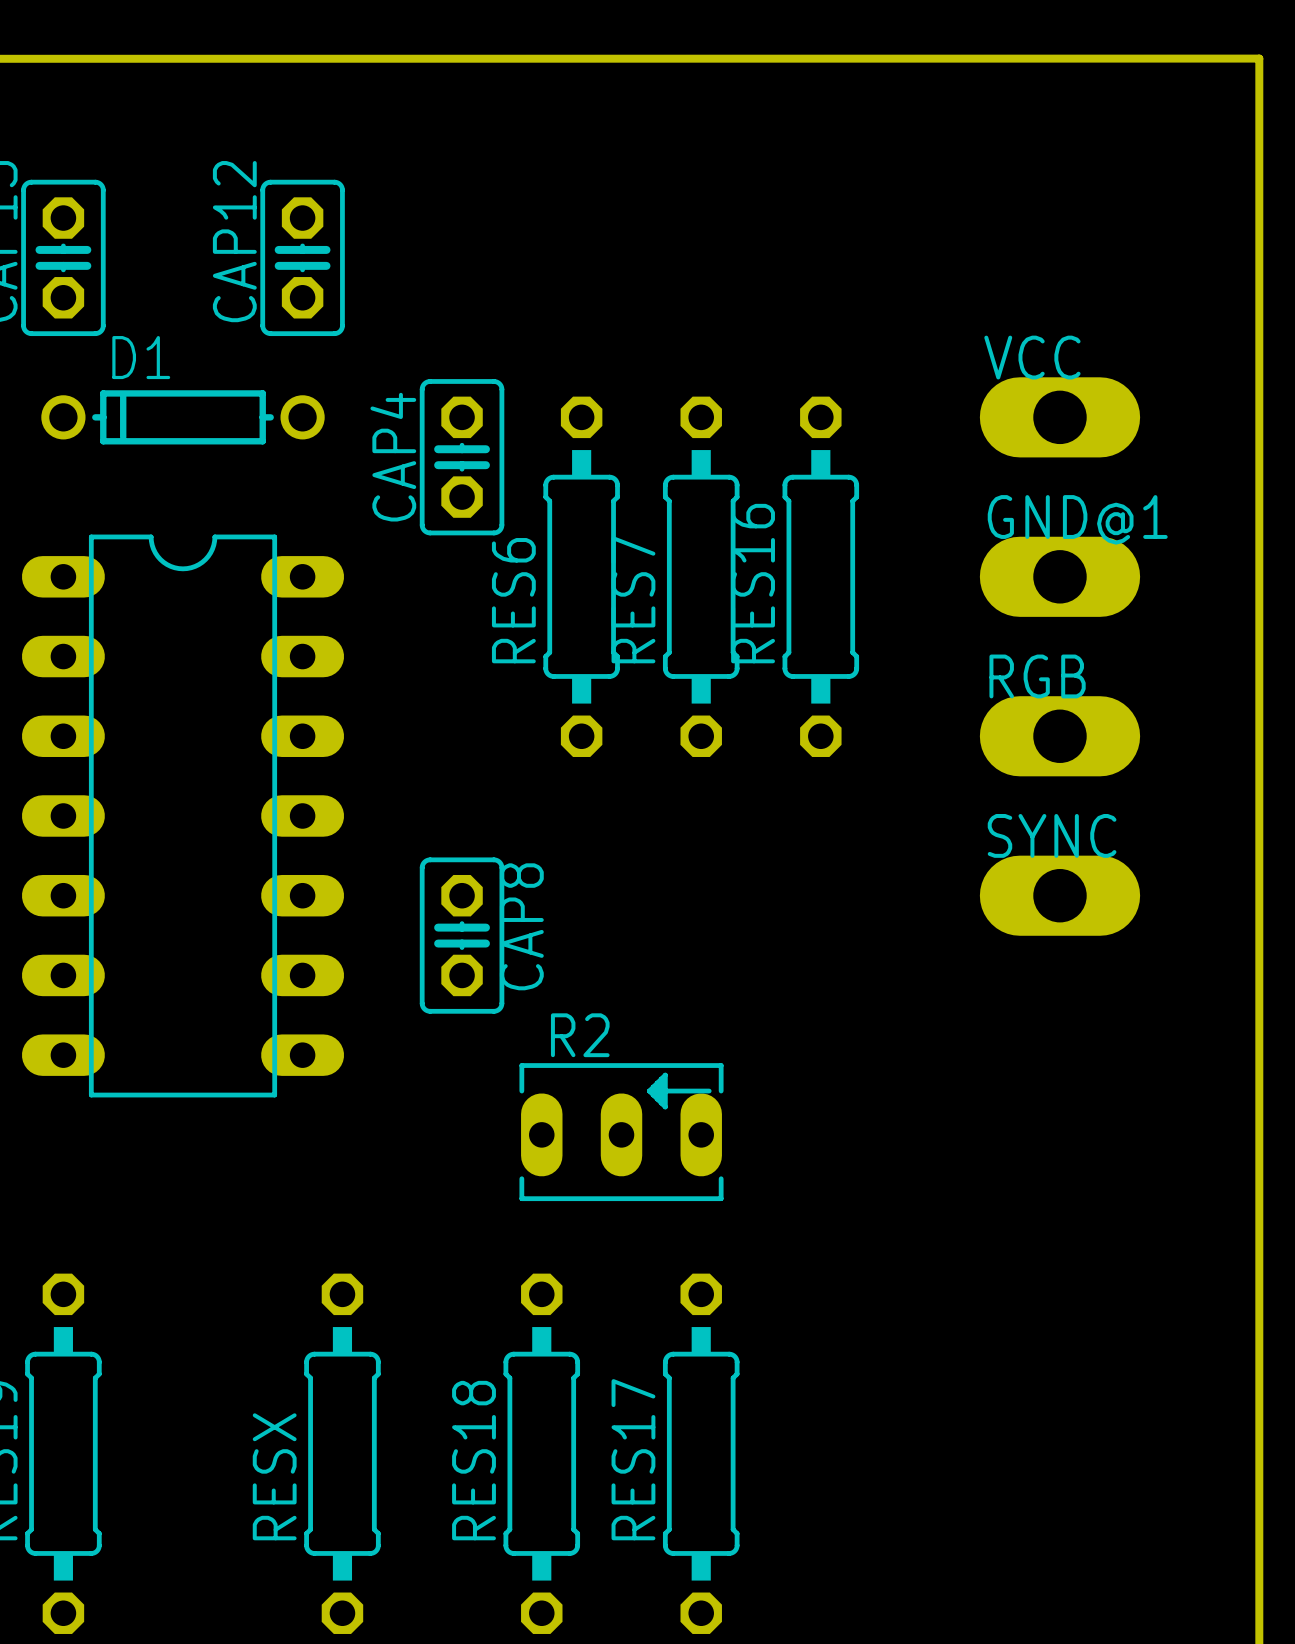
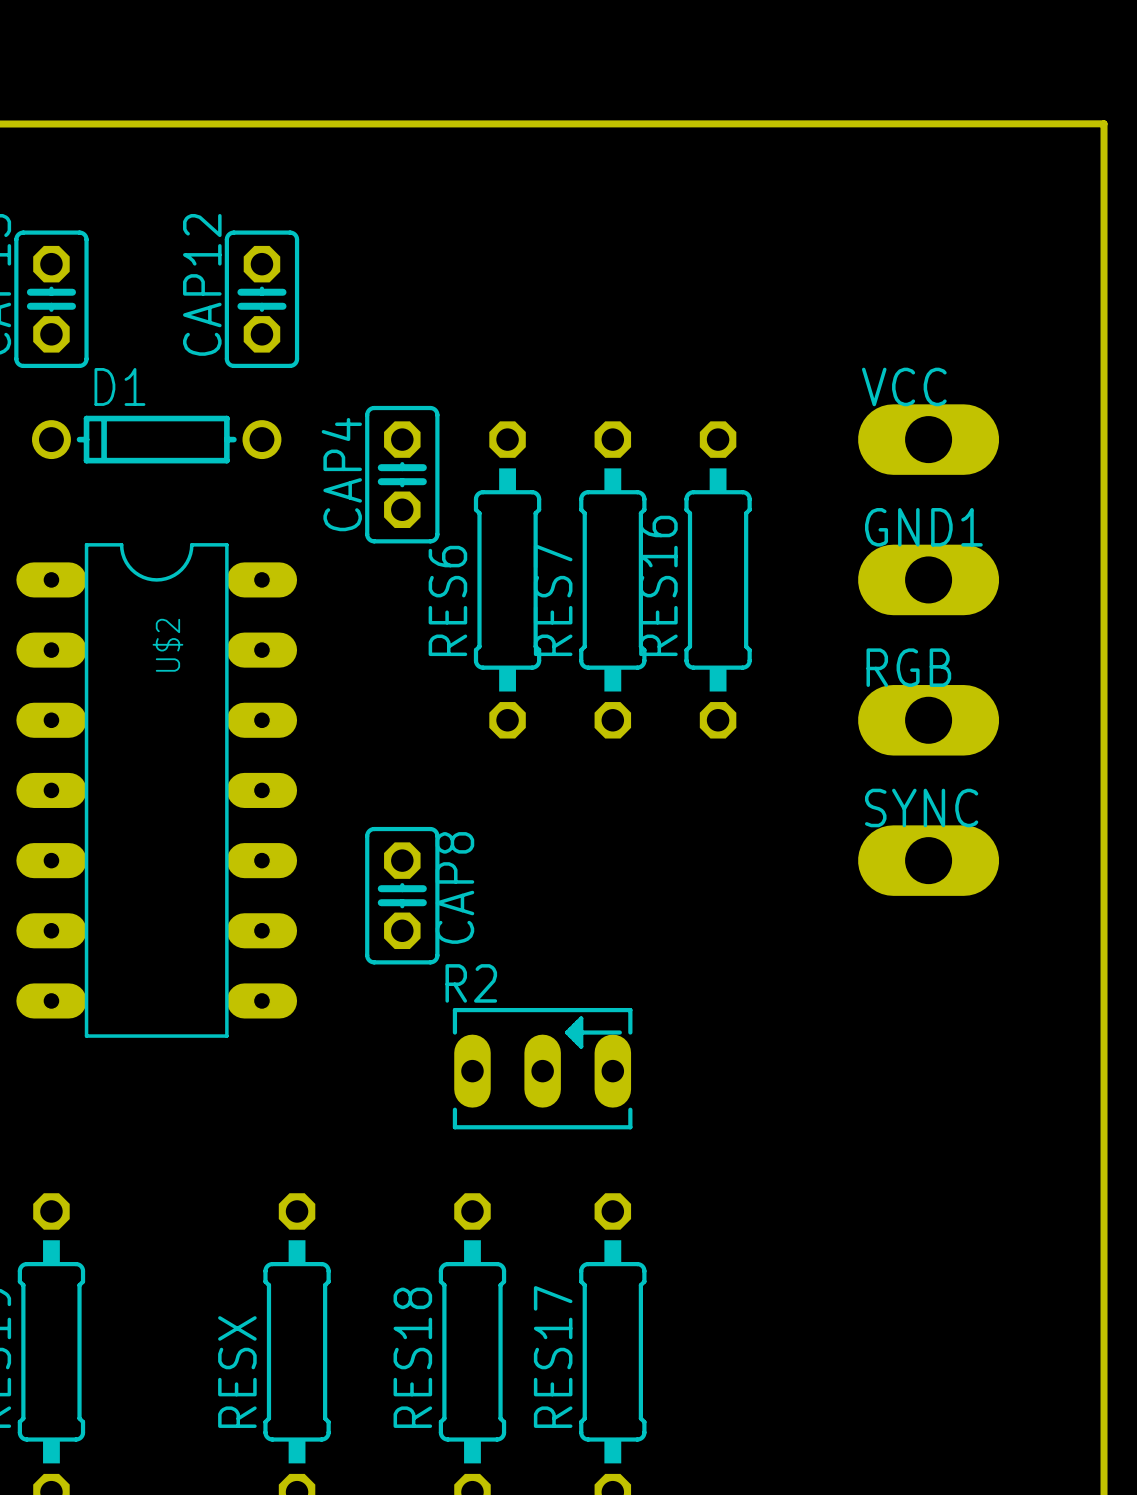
GND@1 name: GND@1 (1077, 519) -> GND1 (923, 527)
part: (183, 815) -> none
U$2: none -> (156, 790)
R2 name position: R2 (580, 1035) -> R2 (471, 983)

